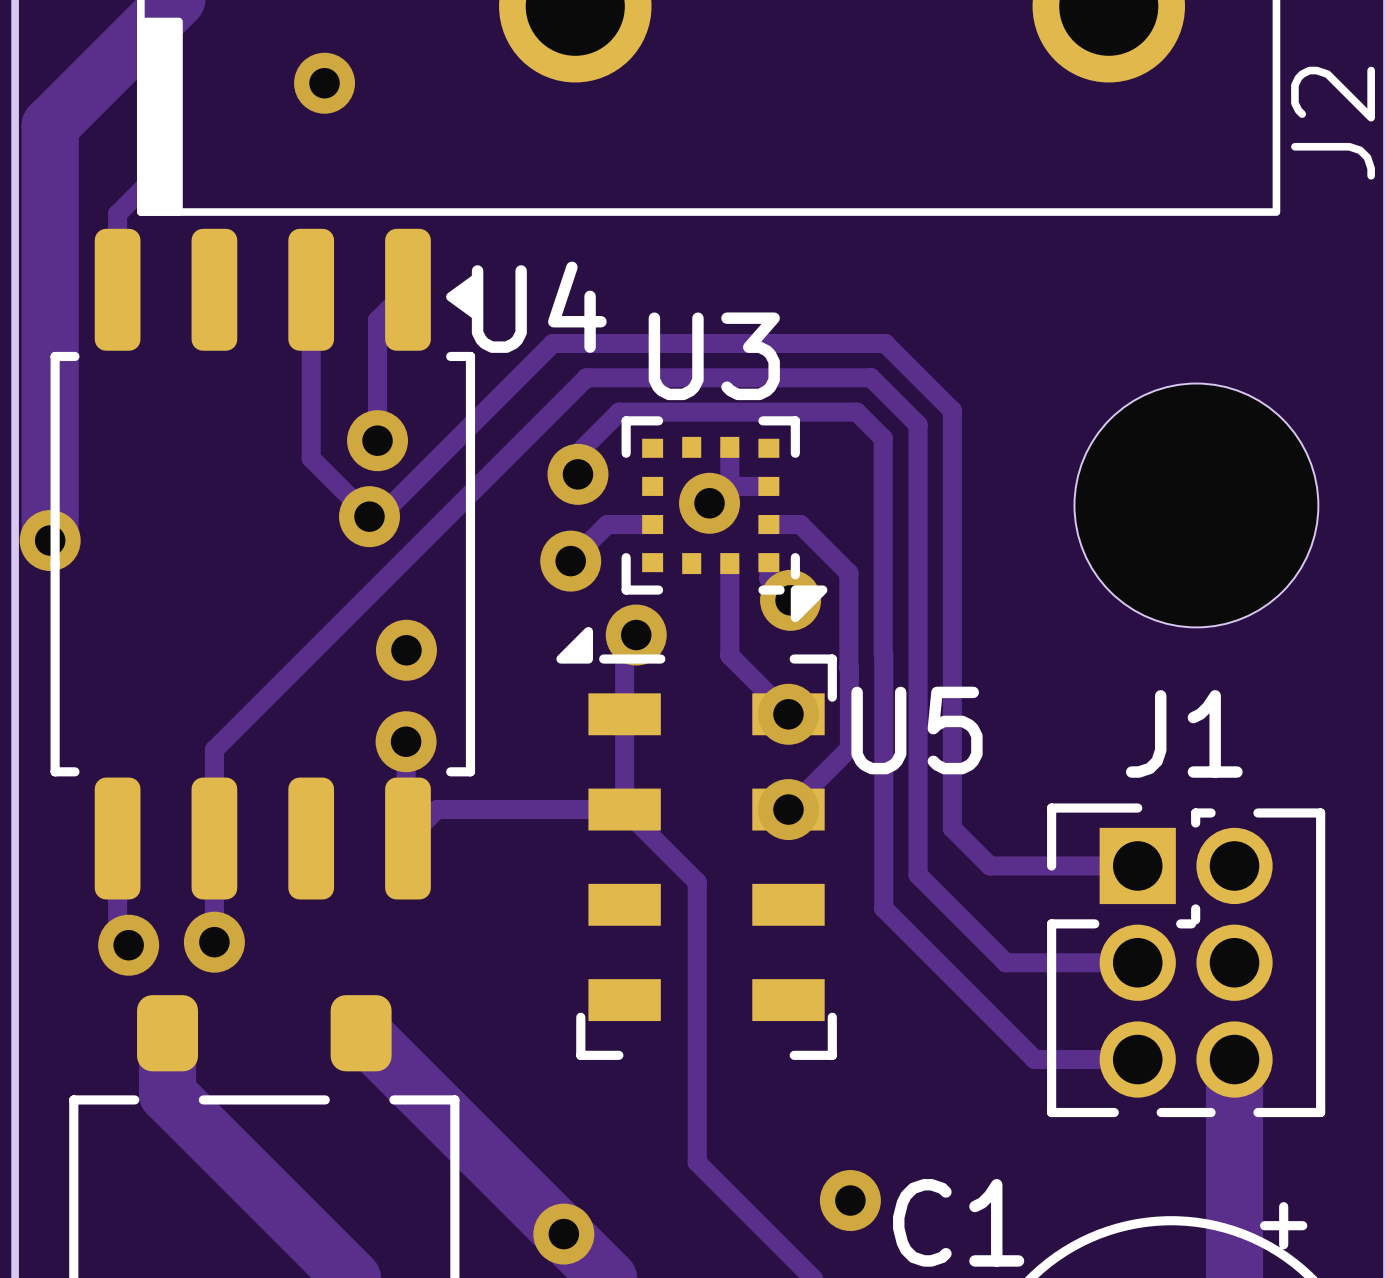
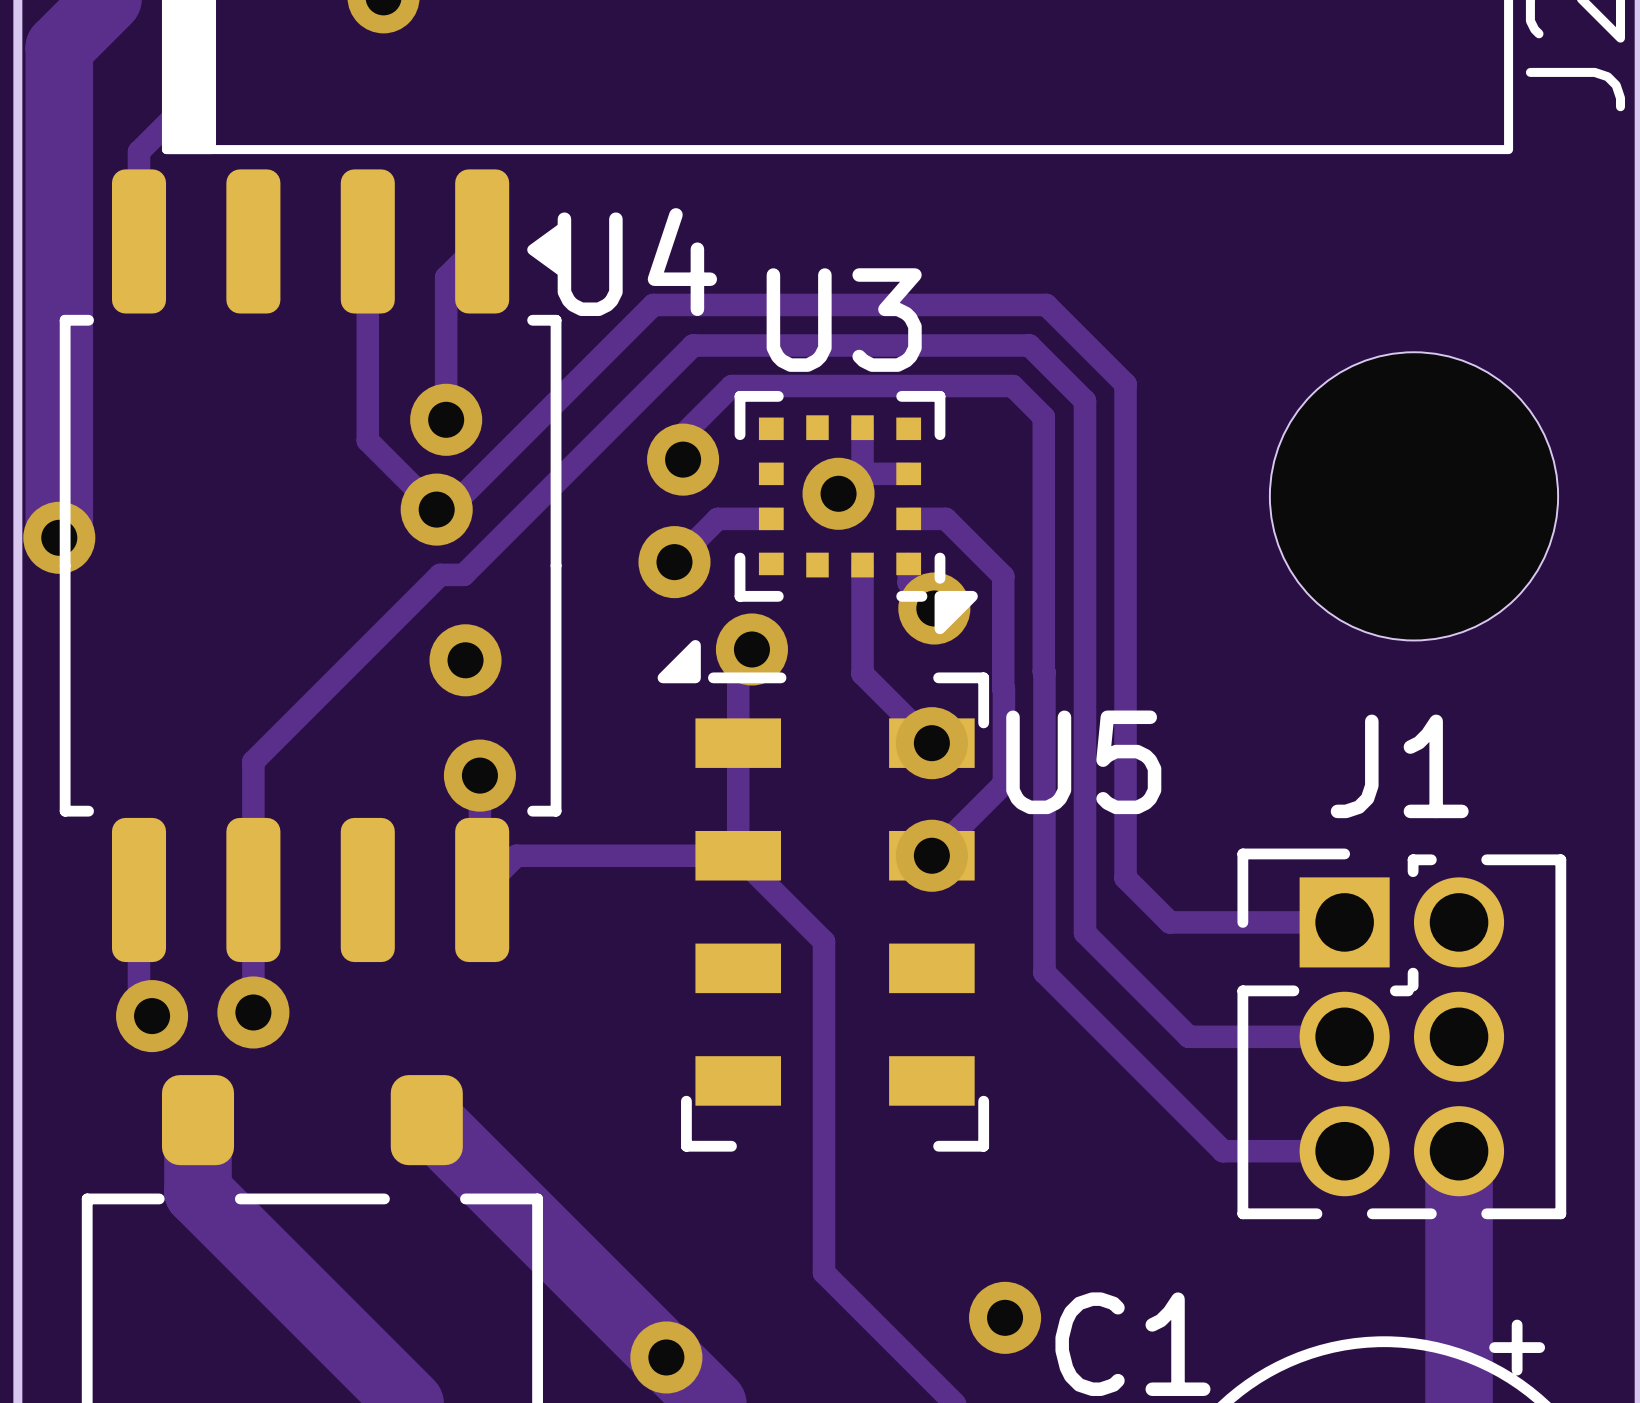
track: (392, 571) (214, 749) -> (463, 574) (440, 574) (253, 761) (253, 785)
via position: (406, 650) -> (465, 660)

